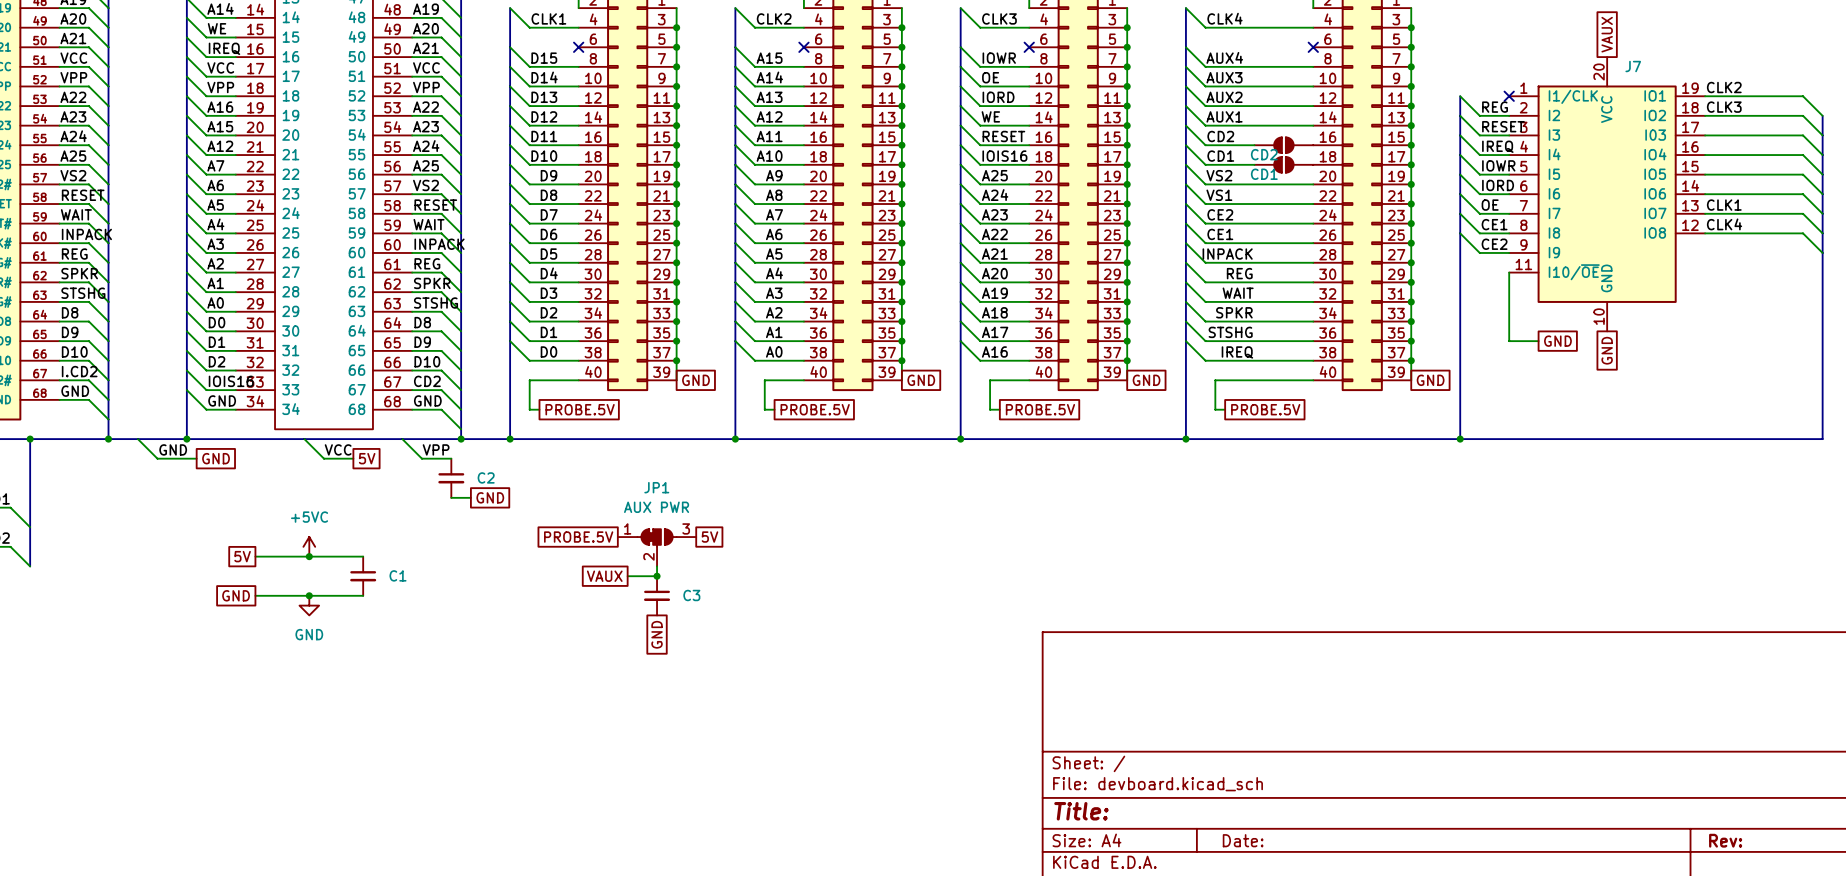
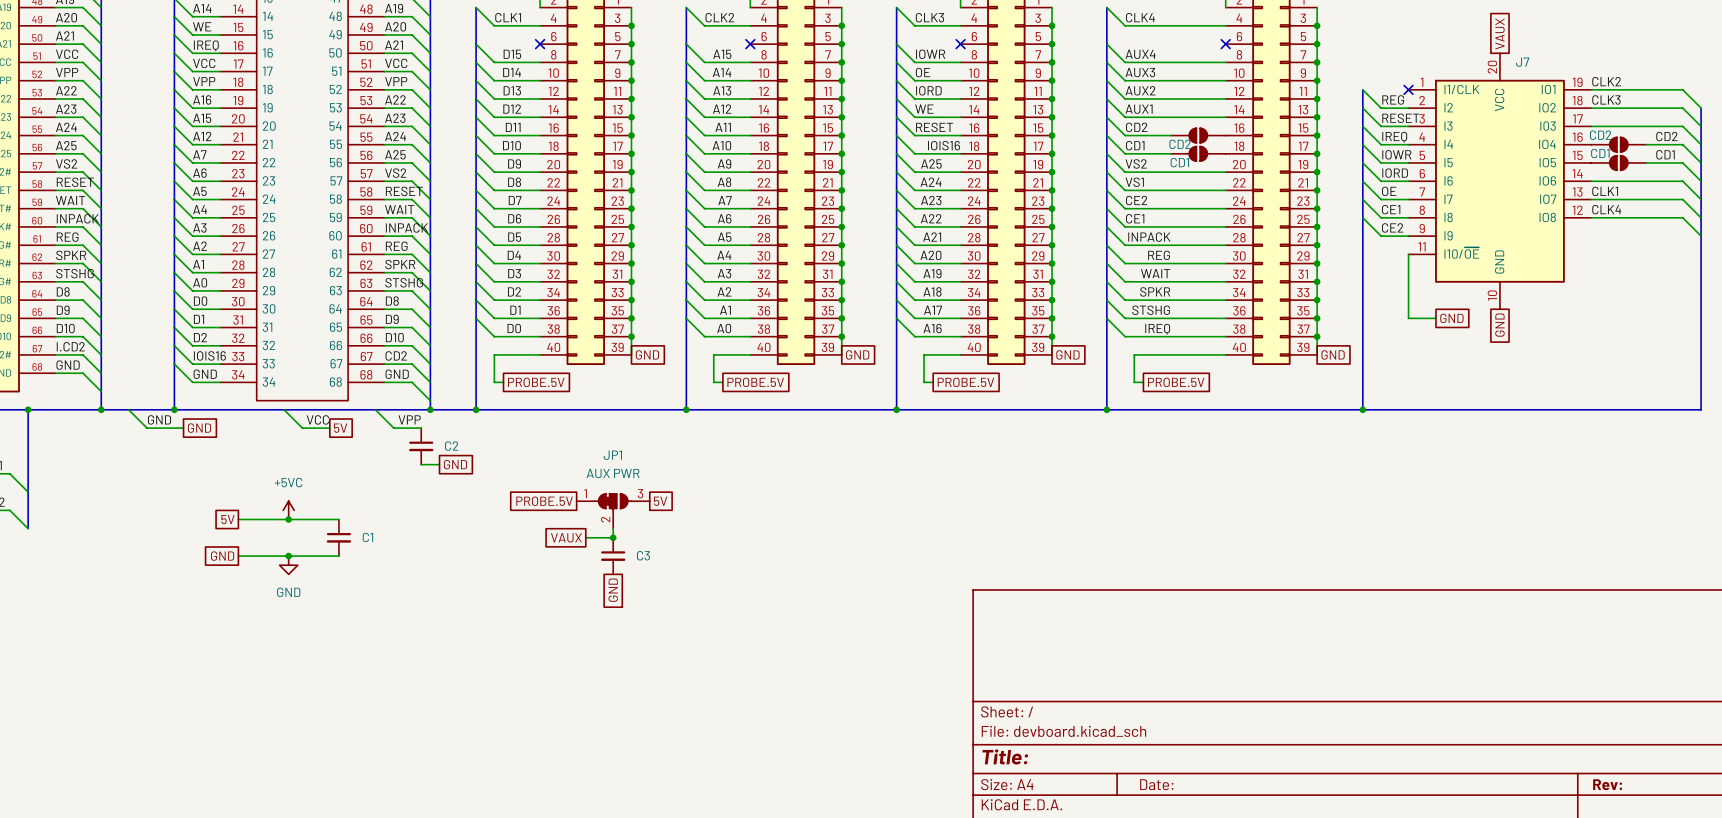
label: none -> CD2 (1666, 136)
part: none -> CD2 (1618, 144)
label: none -> CD1 (1665, 154)
part: none -> CD1 (1618, 162)

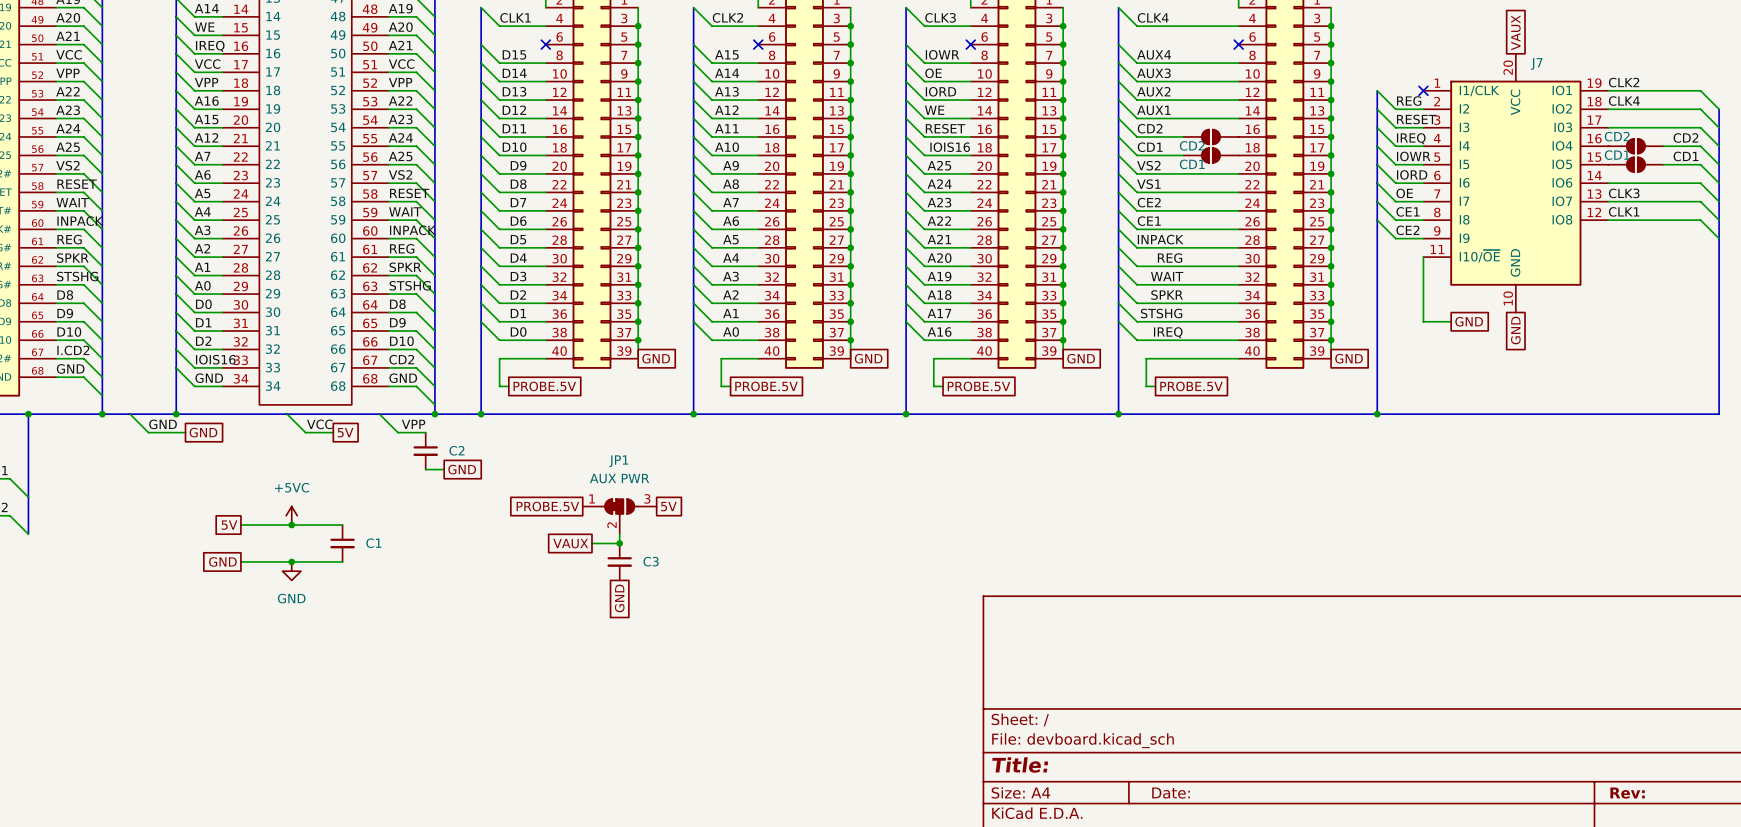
label: CLK3 (1606, 99) -> CLK4 (1624, 101)
label: CLK1 (1605, 191) -> CLK3 (1624, 193)
label: CLK4 (1606, 209) -> CLK1 (1624, 211)

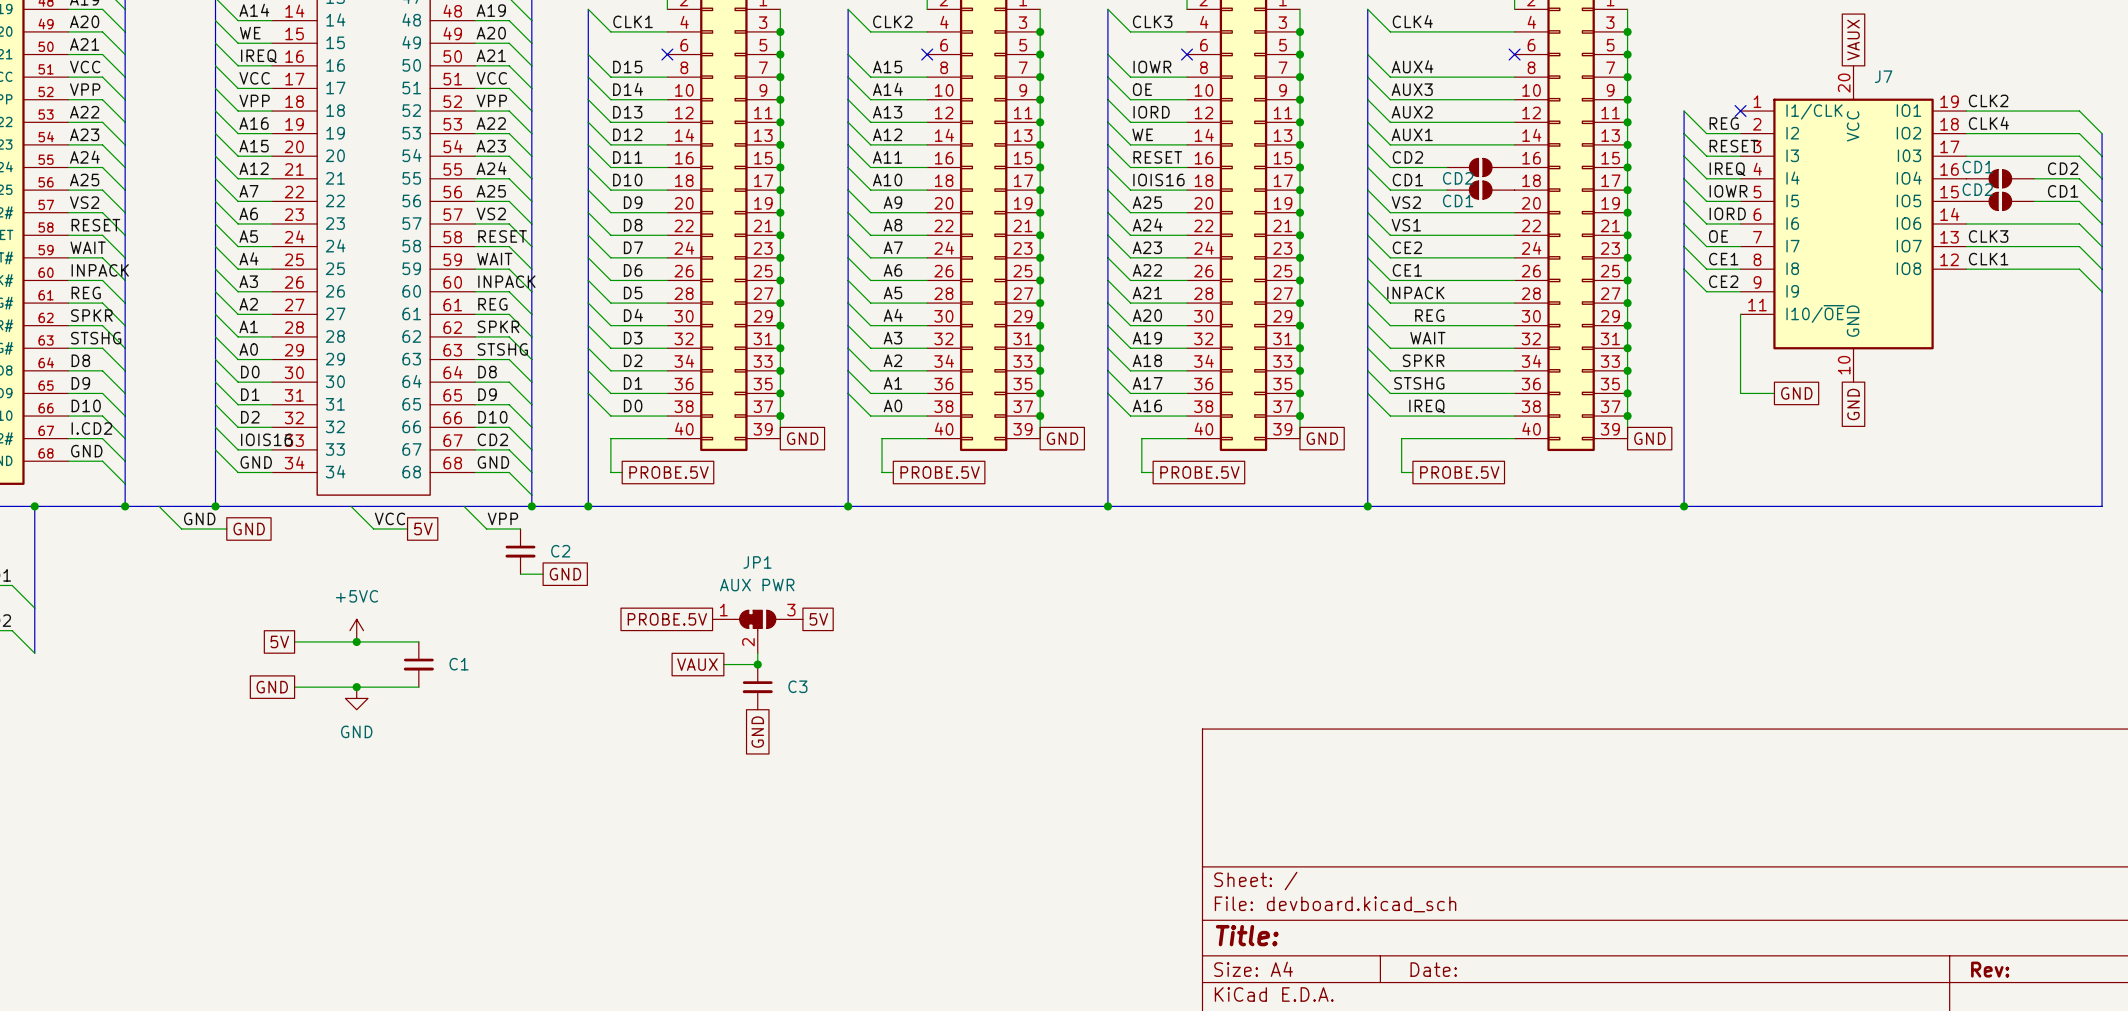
part value: CD2 (1617, 136) -> CD1 (1977, 167)
part value: CD1 (1617, 155) -> CD2 (1977, 189)

